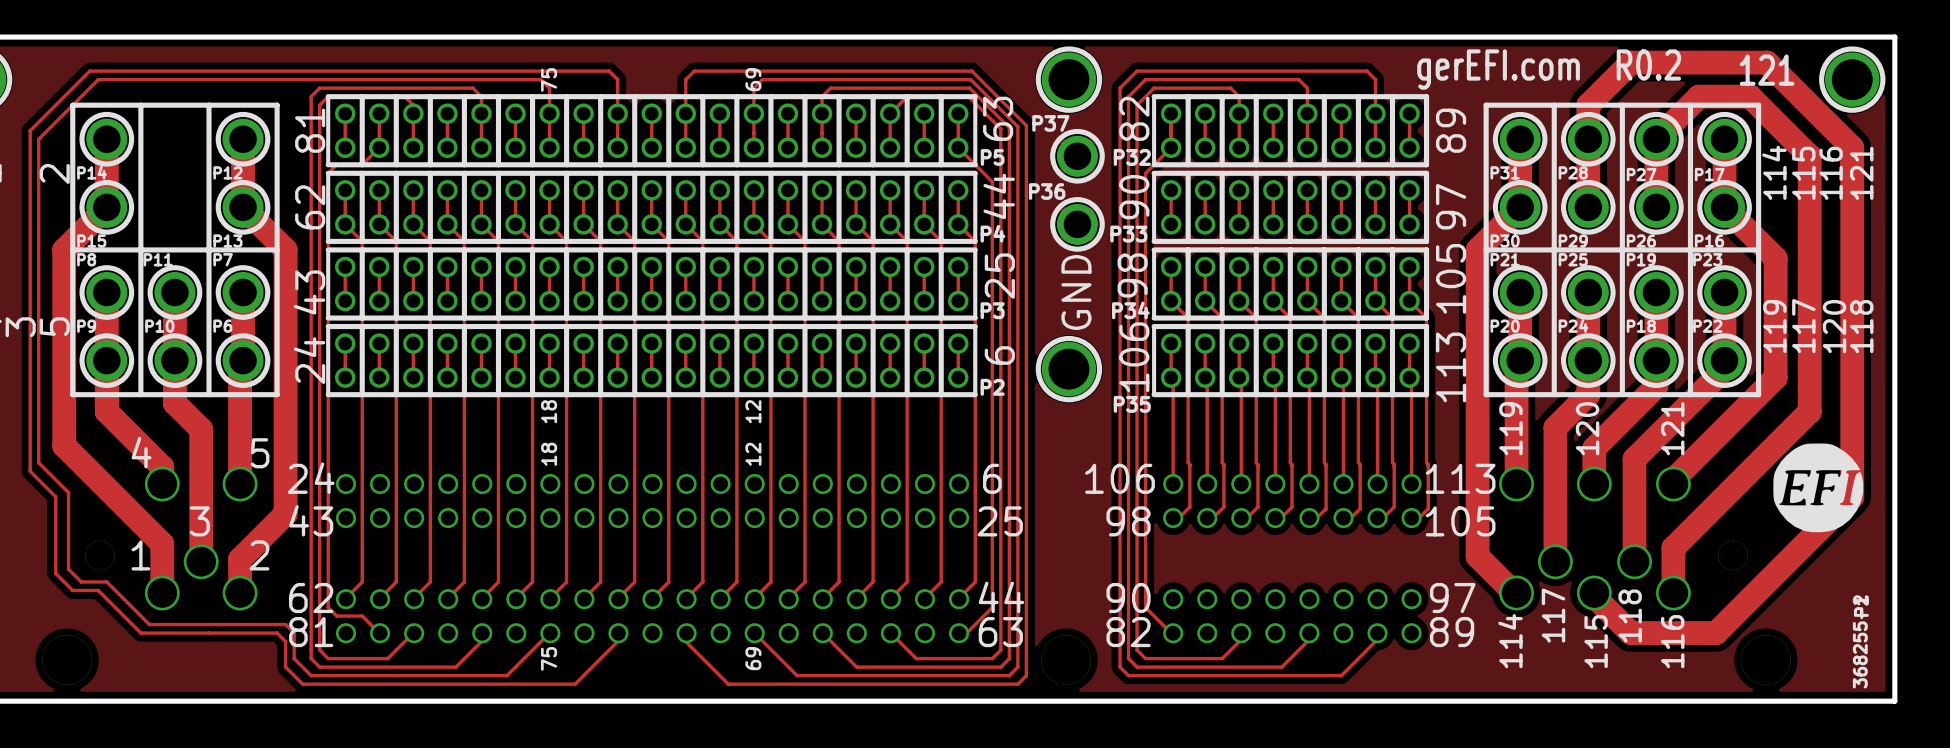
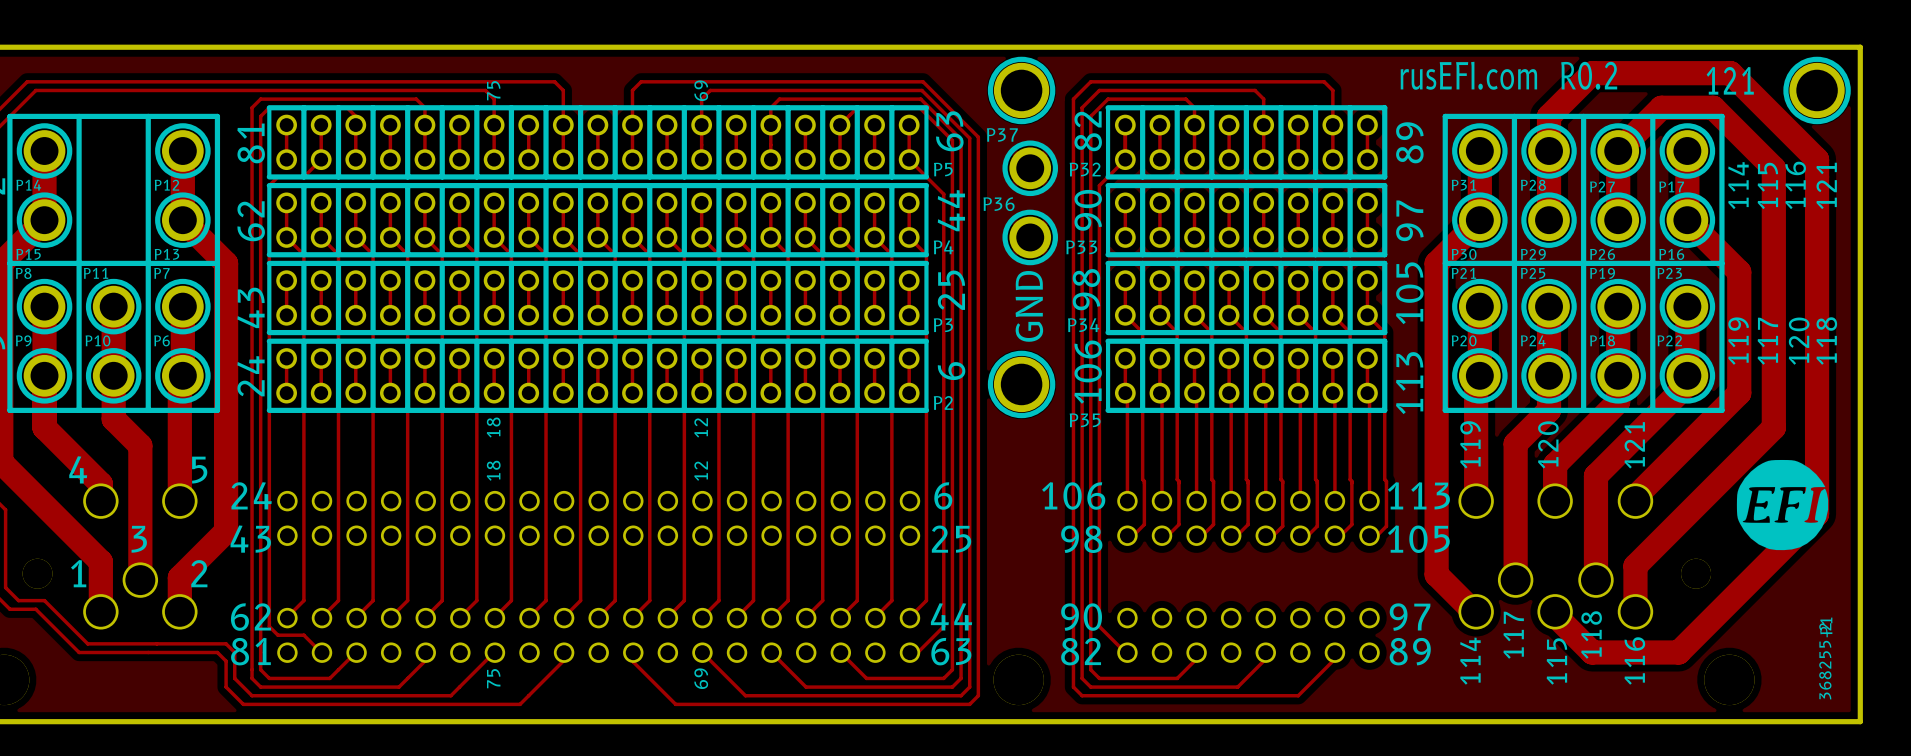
text: gerEFI.com R0.2 (1549, 69) -> rusEFI.com R0.2 (1508, 75)

